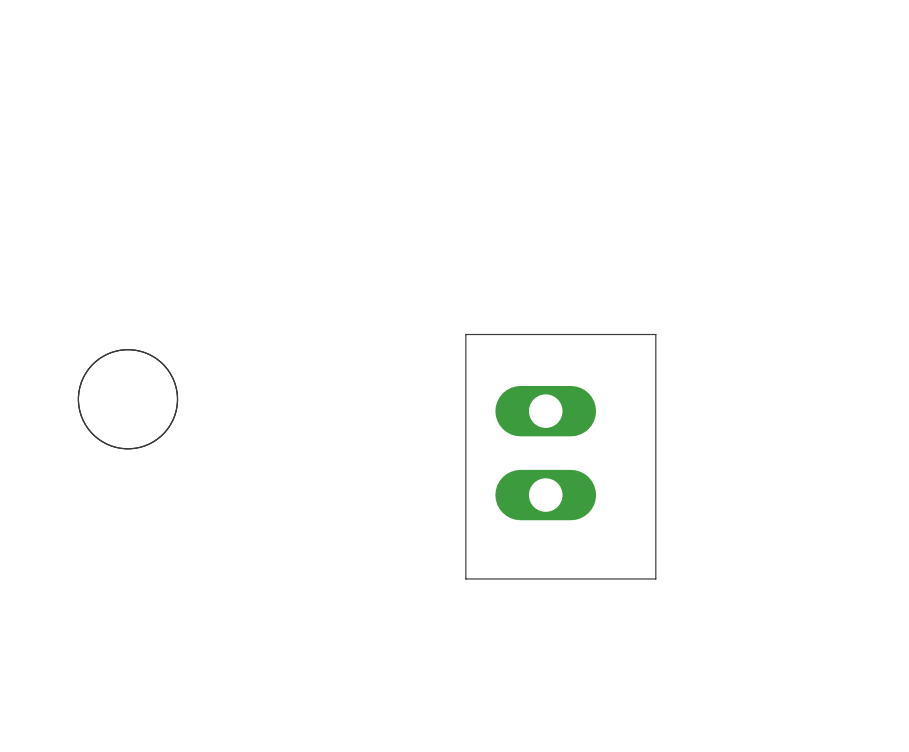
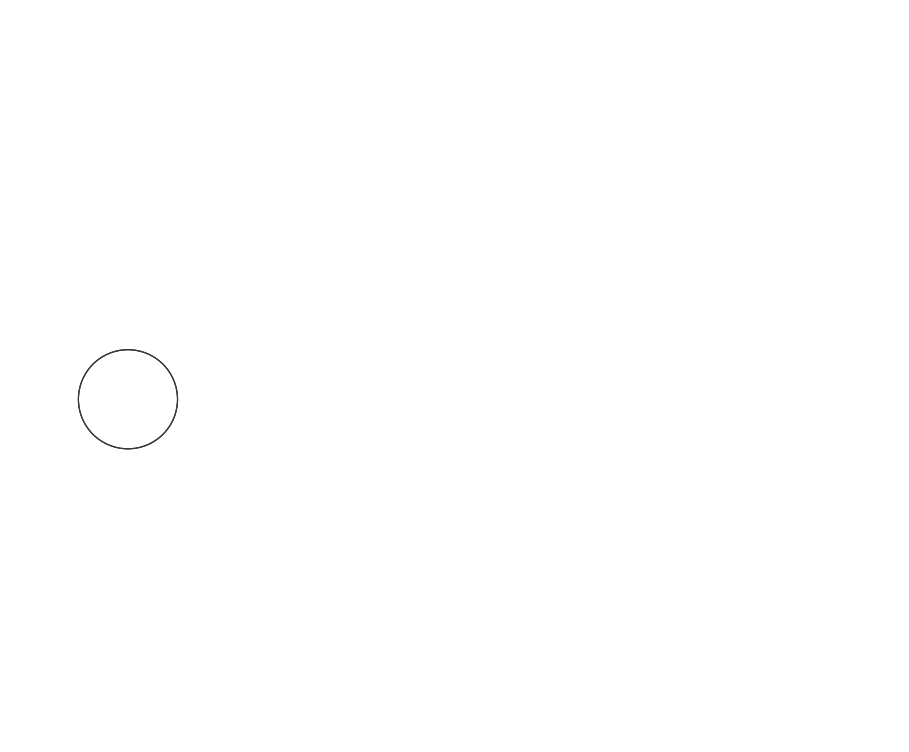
line: (655, 334) (655, 578) (465, 578) (465, 334) (655, 334) -> none
part: (545, 453) -> none

